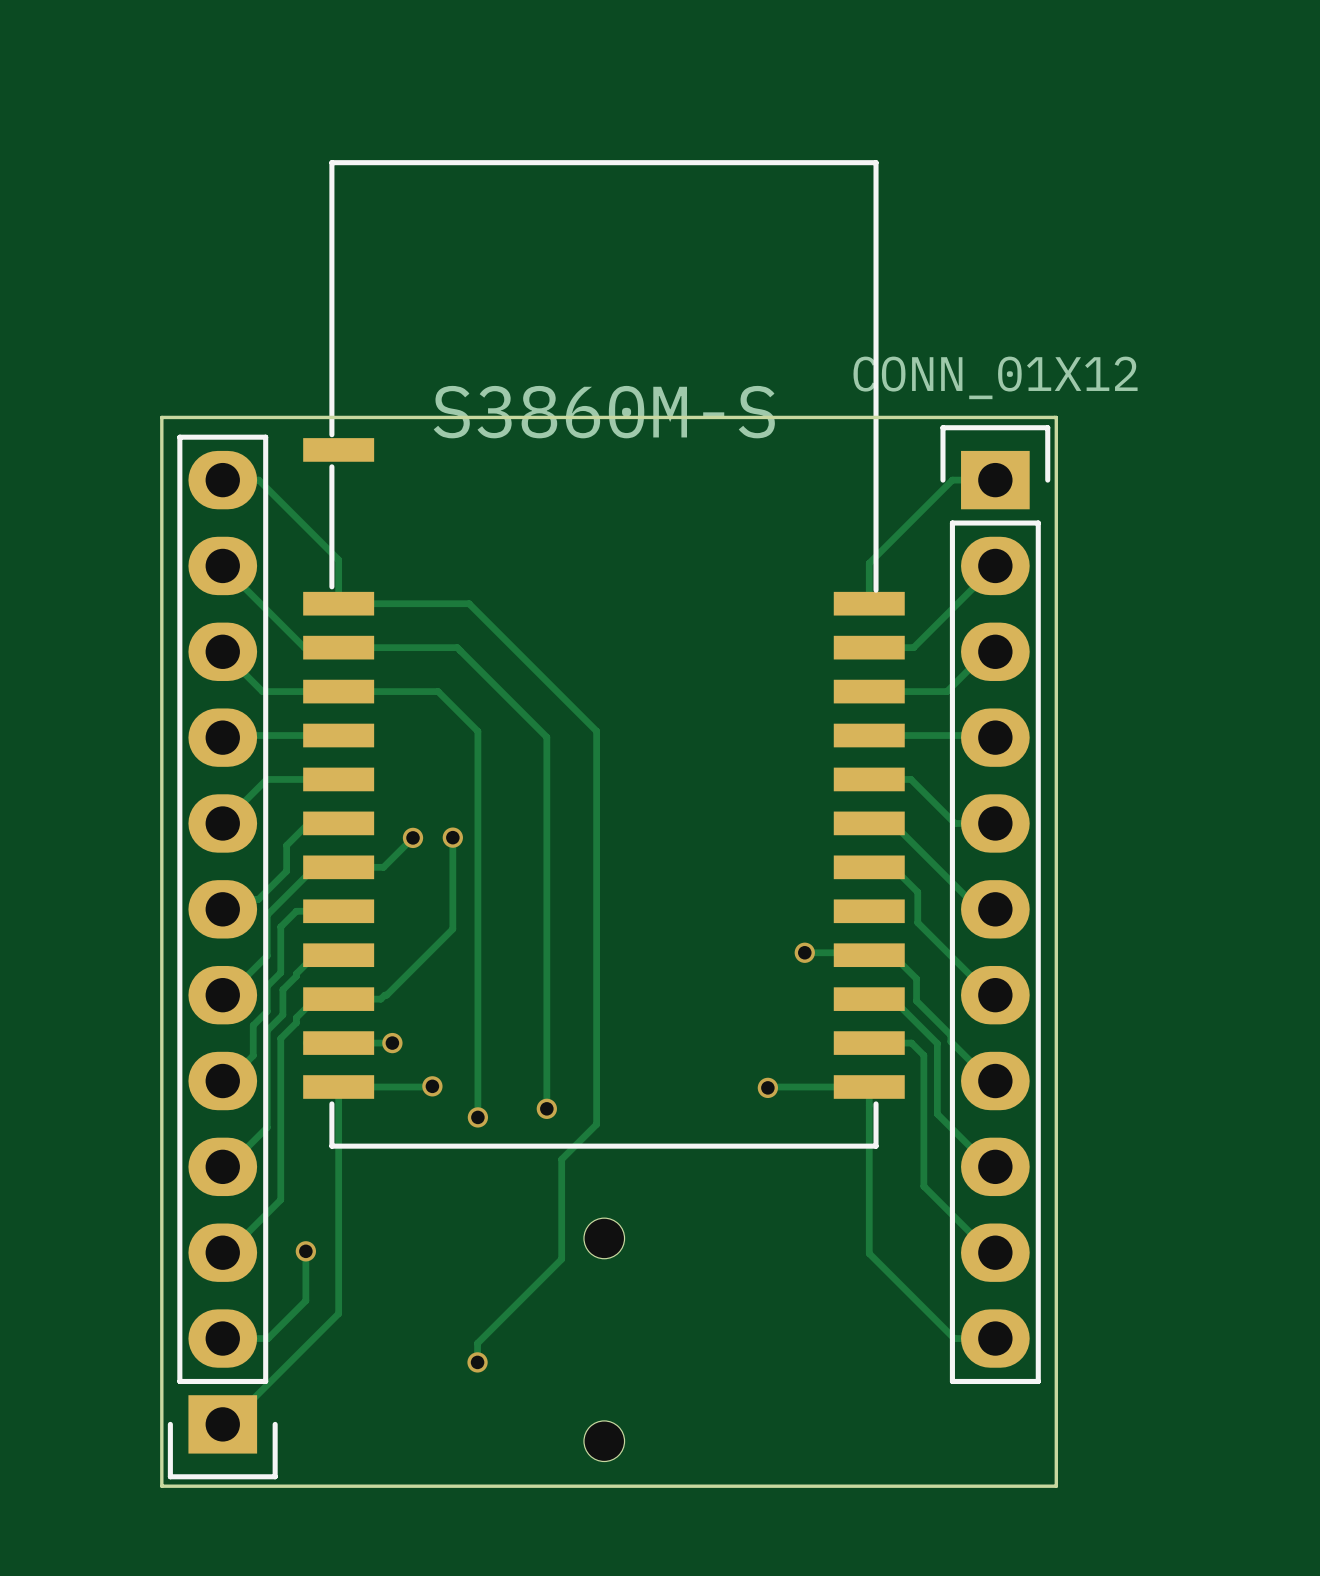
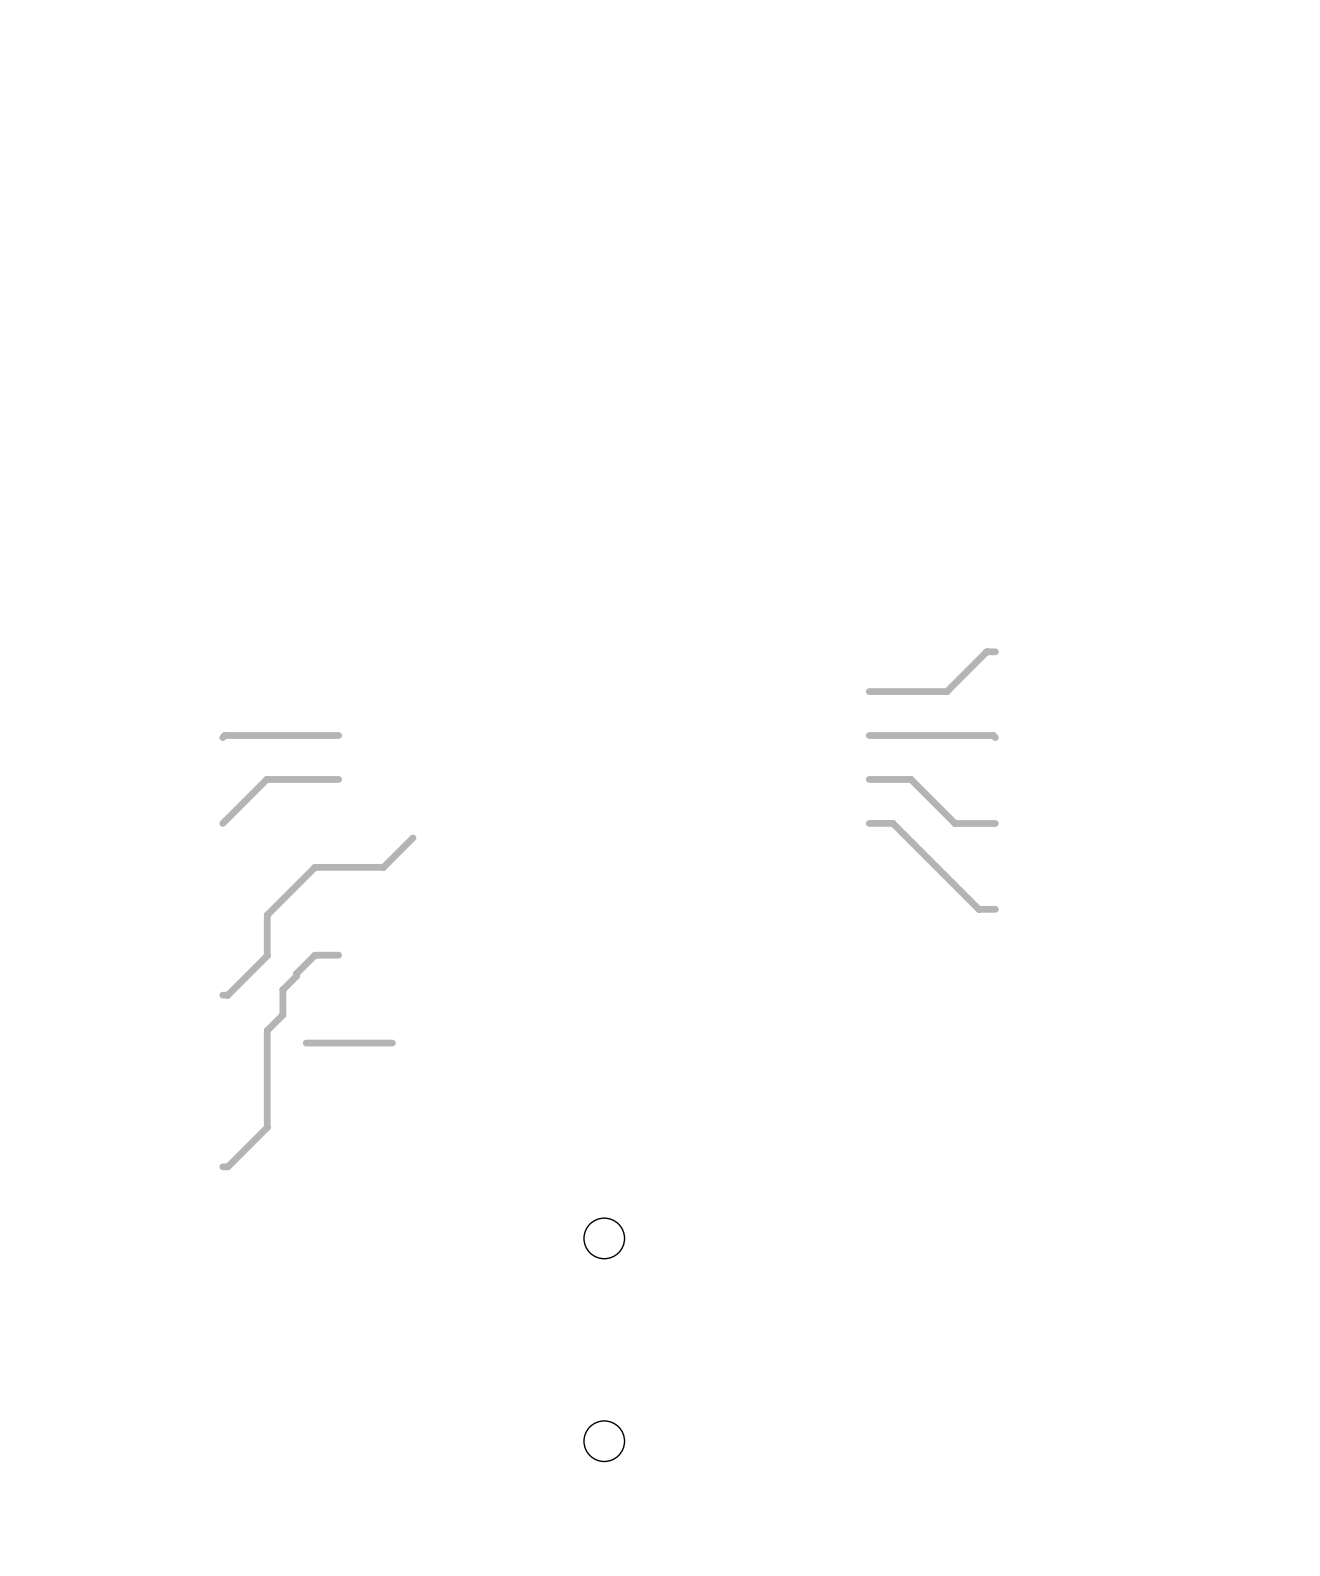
board edge: (1056, 417) (161, 417) (161, 1486) (1056, 1486) (1056, 417) -> none
track: (222, 480) (258, 480) (338, 559) (338, 603) (469, 603) (596, 731) (596, 1124) (561, 1159) (561, 1259) (477, 1343) (477, 1362) -> none
track: (995, 480) (952, 480) (869, 563) (869, 603) -> none
track: (222, 565) (304, 647) (457, 647) (546, 737) (546, 1108) -> none
track: (990, 565) (995, 565) (913, 647) (869, 647) -> none
track: (222, 651) (262, 691) (438, 691) (477, 731) (477, 1117) -> none
part: S3860M-S (603, 654) -> none
track: (338, 823) (308, 823) (286, 845) (286, 871) (258, 899) (237, 899) (227, 909) (222, 909) -> none
via: (413, 837) -> none
track: (452, 837) (452, 929) (380, 999) (315, 999) (296, 1017) (296, 1022) (280, 1038) (280, 1199) (227, 1252) -> none
via: (452, 837) -> none
track: (869, 867) (892, 867) (917, 892) (917, 922) (990, 995) (995, 995) -> none
part: CONN_01X12 (995, 904) -> none
track: (338, 911) (296, 911) (280, 926) (280, 972) (267, 986) (267, 1011) (253, 1025) (253, 1055) (227, 1081) (222, 1081) -> none
track: (804, 952) (866, 952) (869, 955) (892, 955) (916, 978) (916, 1001) (950, 1035) (950, 1041) (990, 1081) (995, 1081) -> none
via: (804, 952) -> none
part: (222, 956) -> none
track: (869, 999) (892, 999) (937, 1043) (937, 1114) (990, 1166) (995, 1166) -> none
via: (392, 1043) -> none
track: (869, 1043) (911, 1043) (923, 1055) (923, 1186) (990, 1252) (995, 1252) -> none
track: (432, 1086) (338, 1087) (338, 1313) (227, 1424) (222, 1424) -> none
via: (432, 1086) -> none
track: (767, 1087) (869, 1087) (869, 1253) (954, 1338) (995, 1338) -> none
via: (767, 1087) -> none
via: (546, 1108) -> none
via: (477, 1117) -> none
track: (305, 1251) (305, 1300) (268, 1338) (222, 1338) -> none
via: (305, 1251) -> none
via: (477, 1362) -> none

